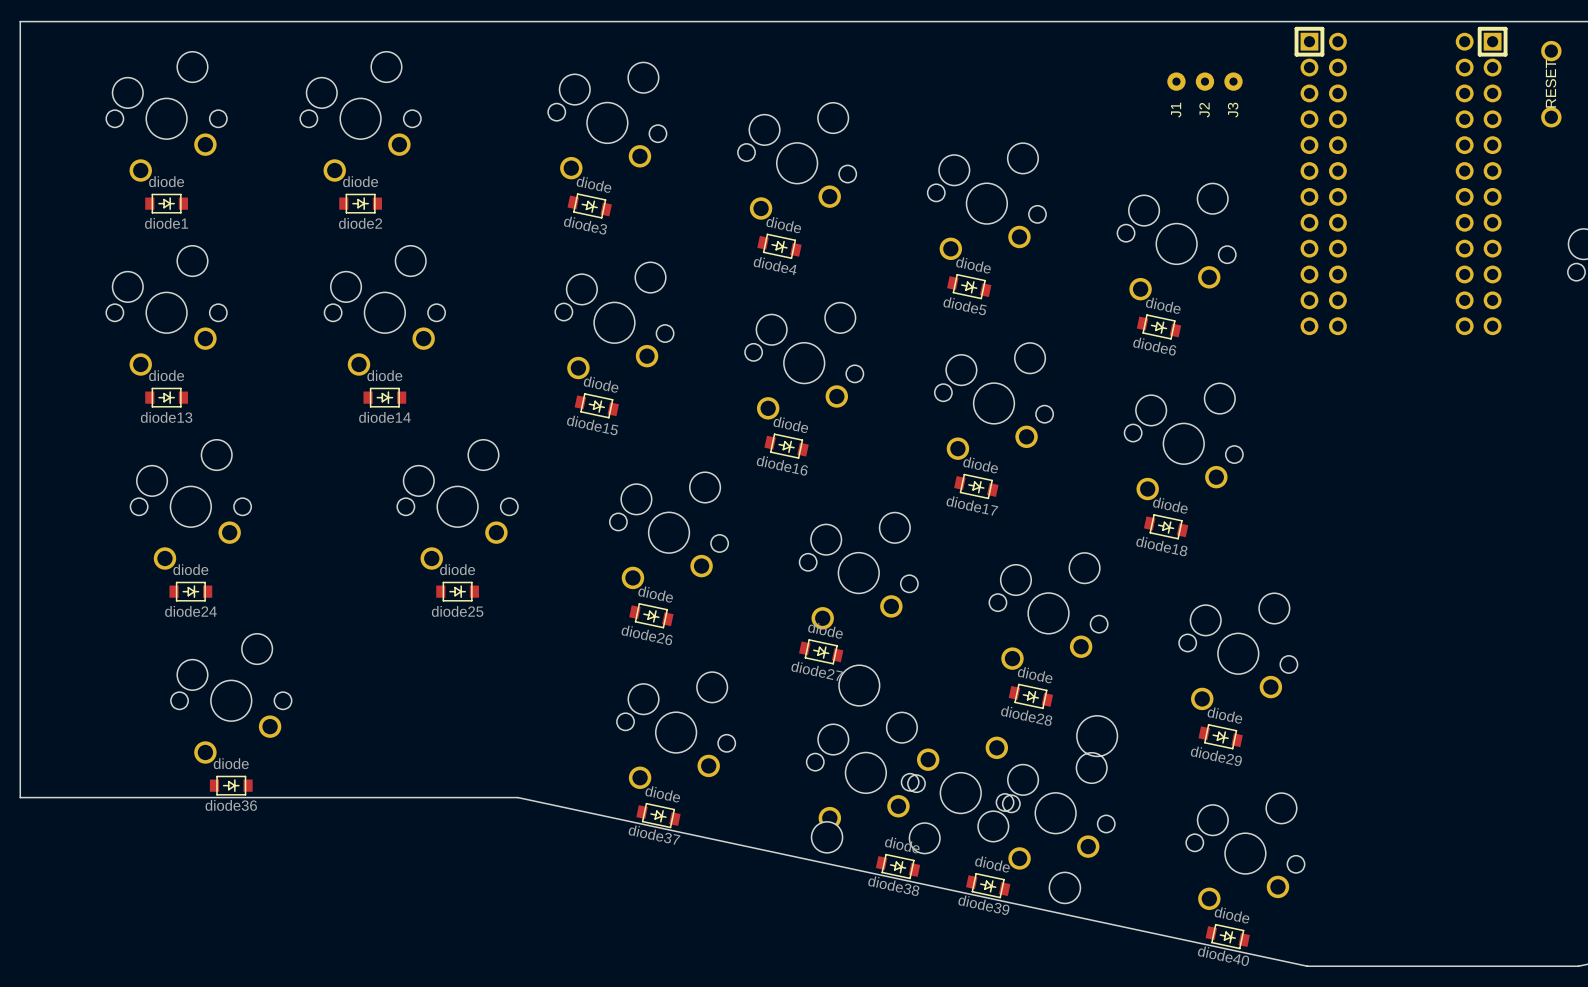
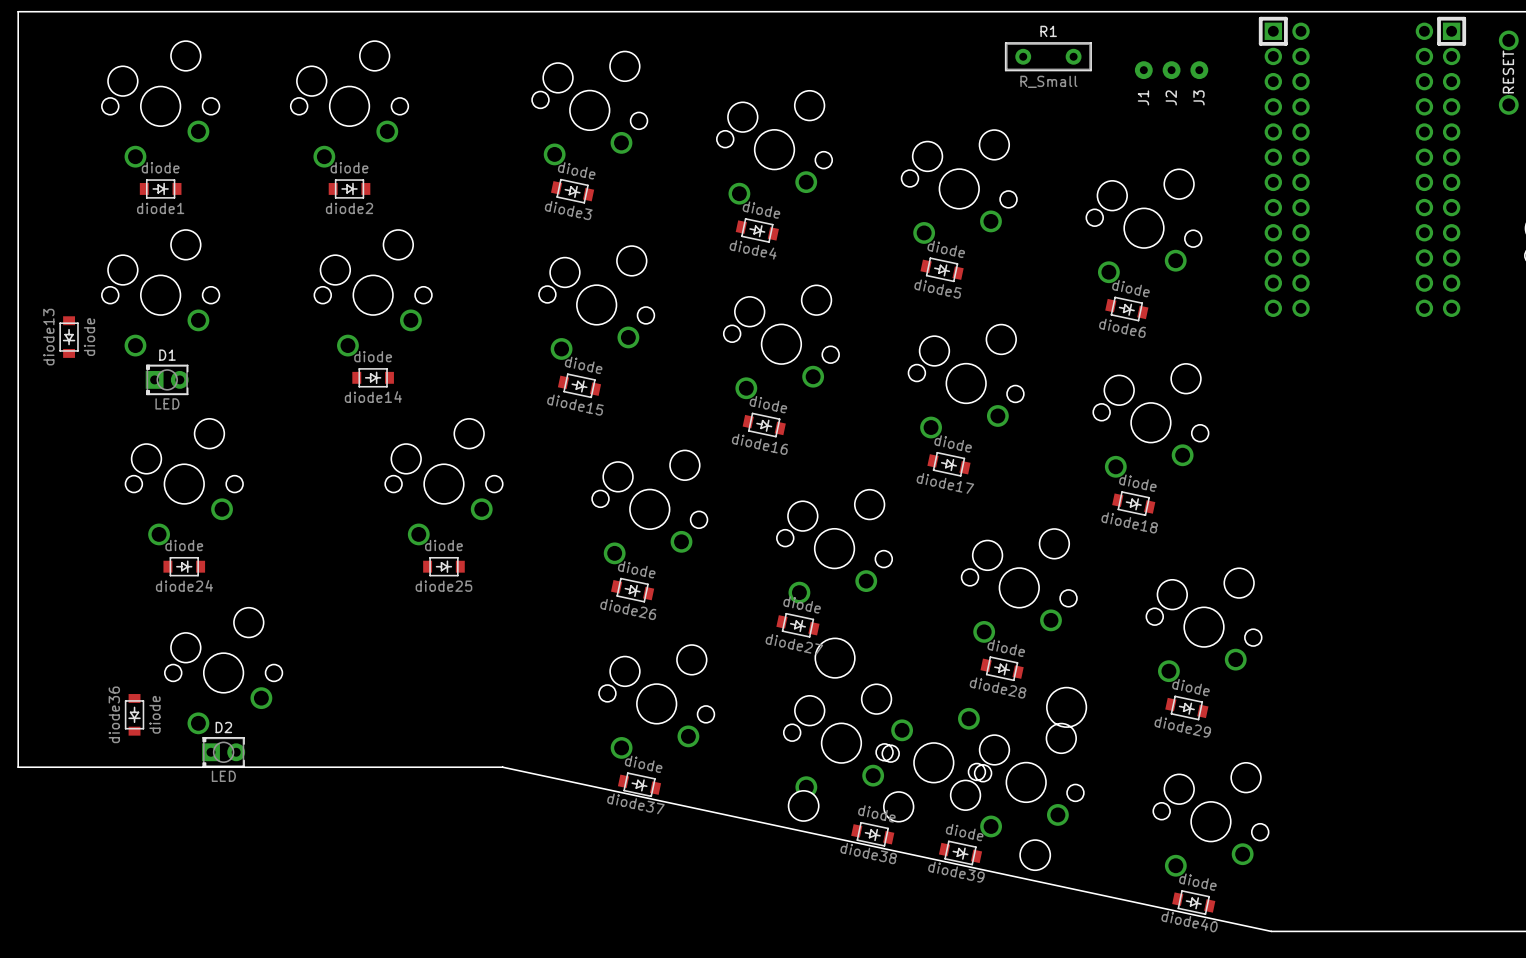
R1: none -> R_Small (1048, 56)
diode13 rotation: 0° (166, 397) -> 90° clockwise (69, 337)
diode13 position: (166, 397) -> (69, 337)
D1: none -> LED (167, 379)
D2: none -> LED (223, 752)
diode36 rotation: 0° (231, 785) -> 90° clockwise (134, 714)
diode36 position: (231, 785) -> (134, 714)

